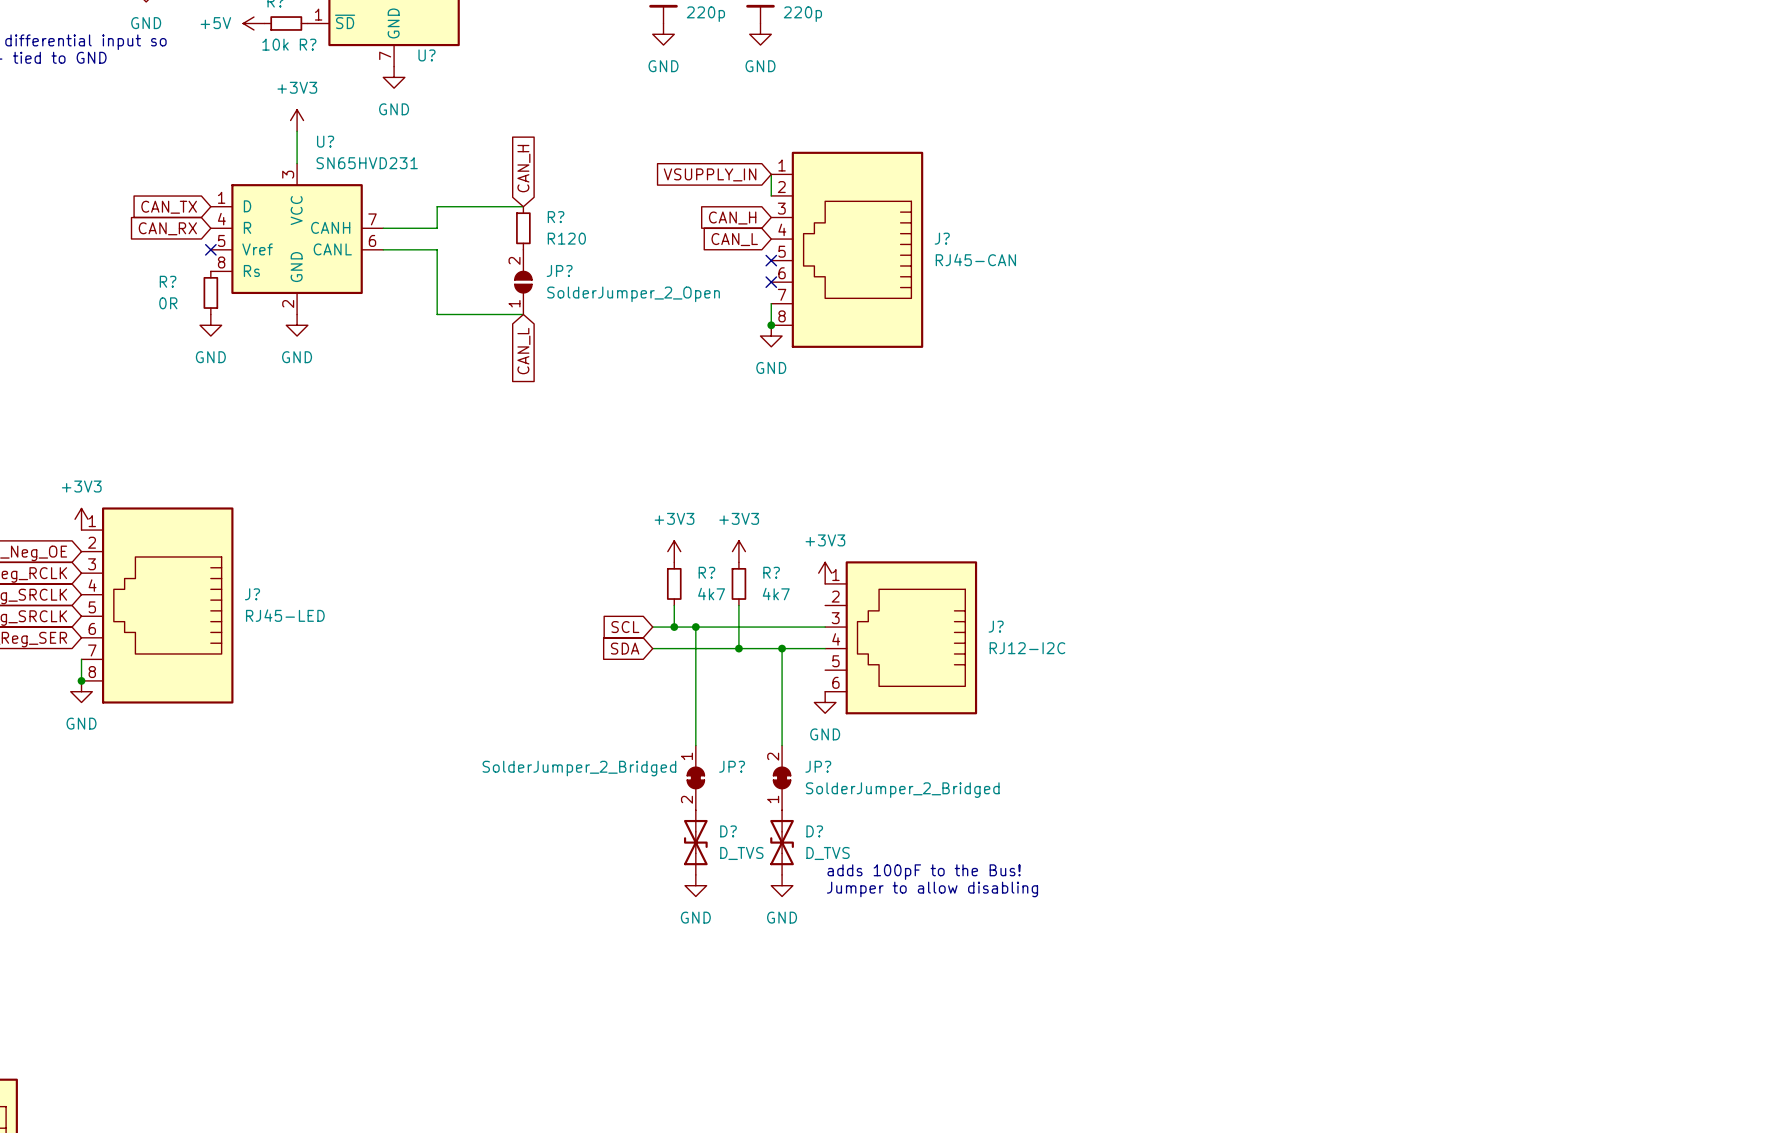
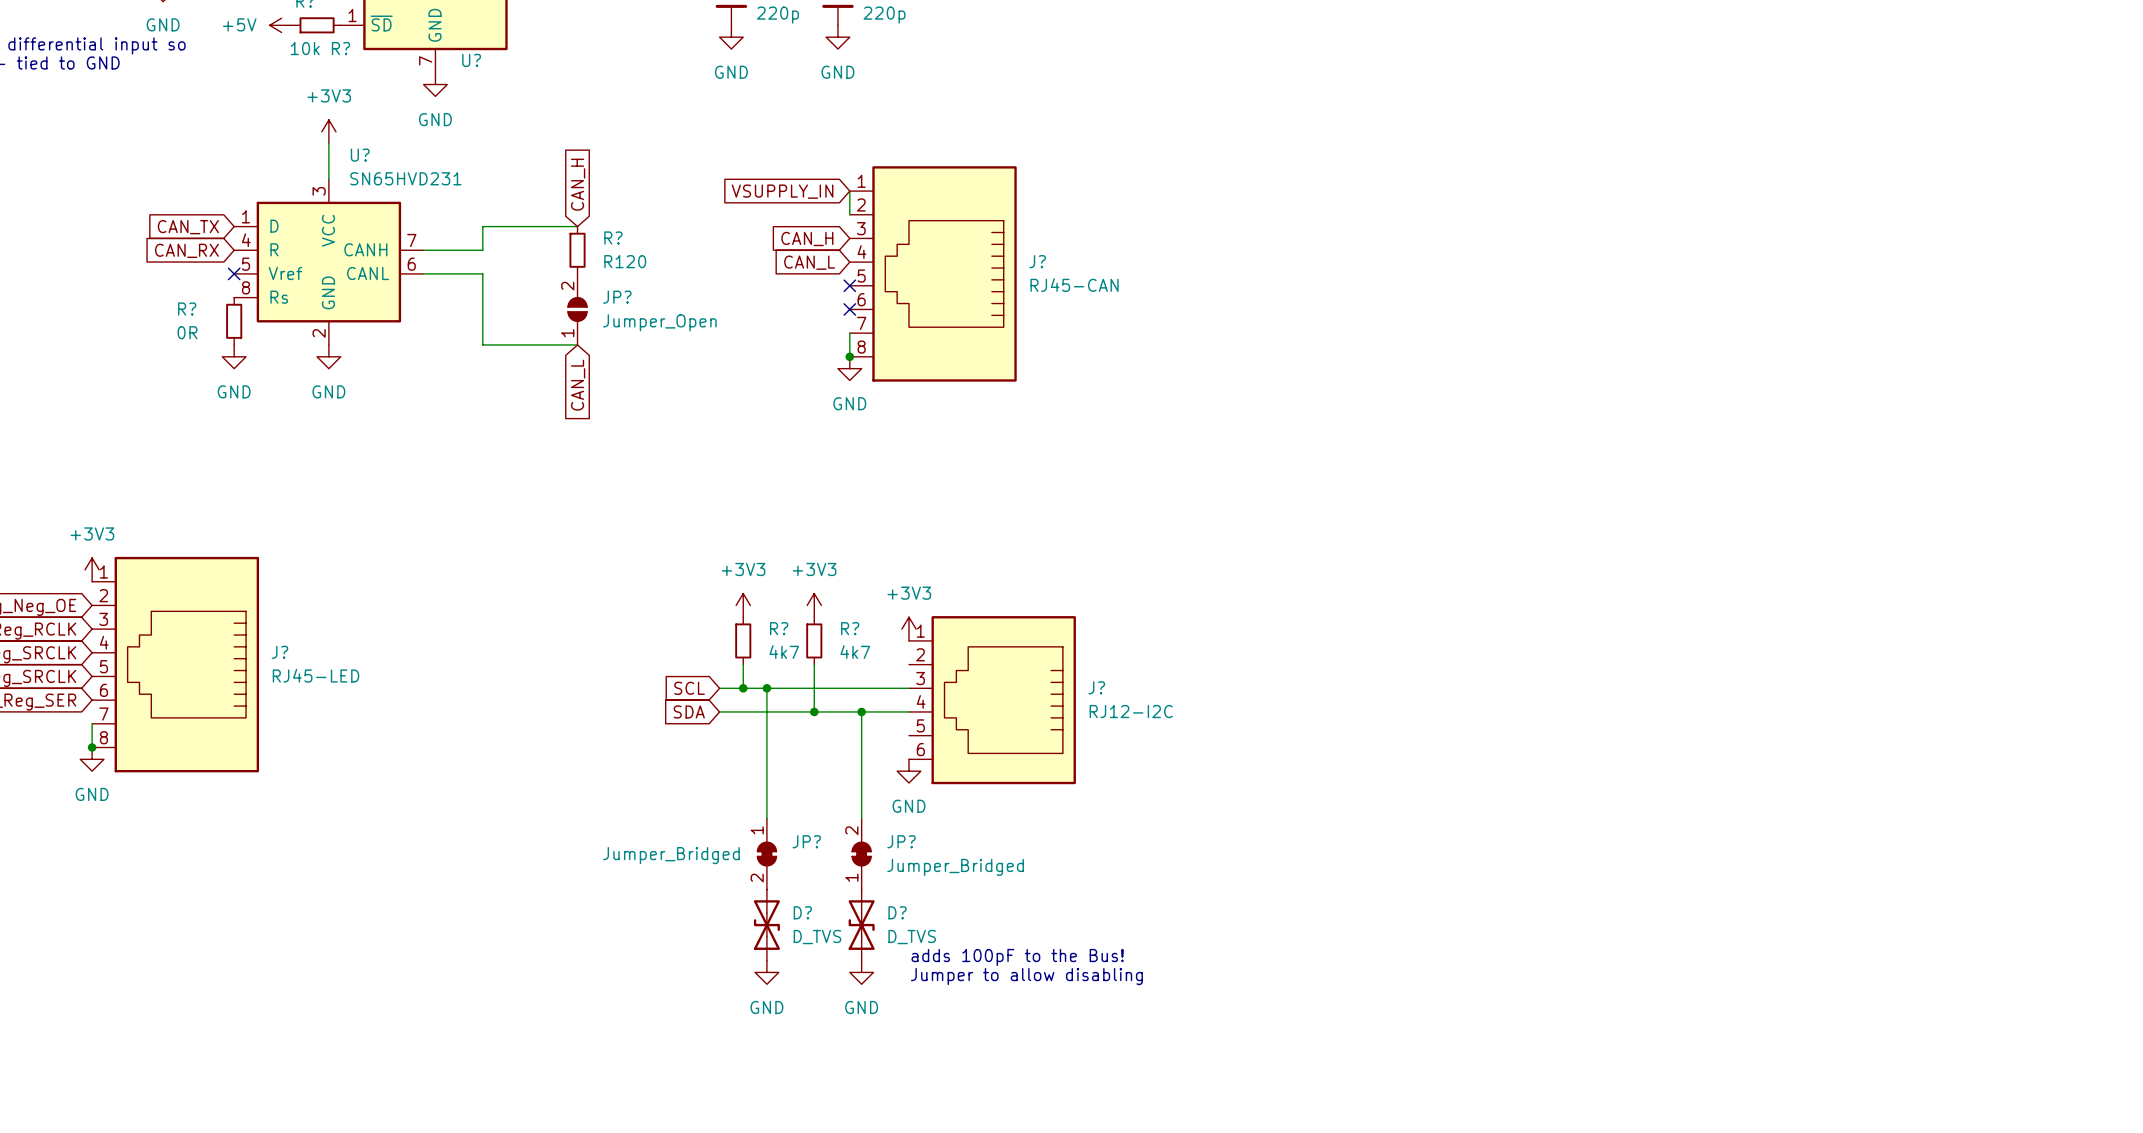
JP? value: SolderJumper_2_Open (633, 294) -> Jumper_Open (659, 322)
JP? value: SolderJumper_2_Bridged (579, 768) -> Jumper_Bridged (671, 855)
JP? value: SolderJumper_2_Bridged (902, 790) -> Jumper_Bridged (955, 867)

